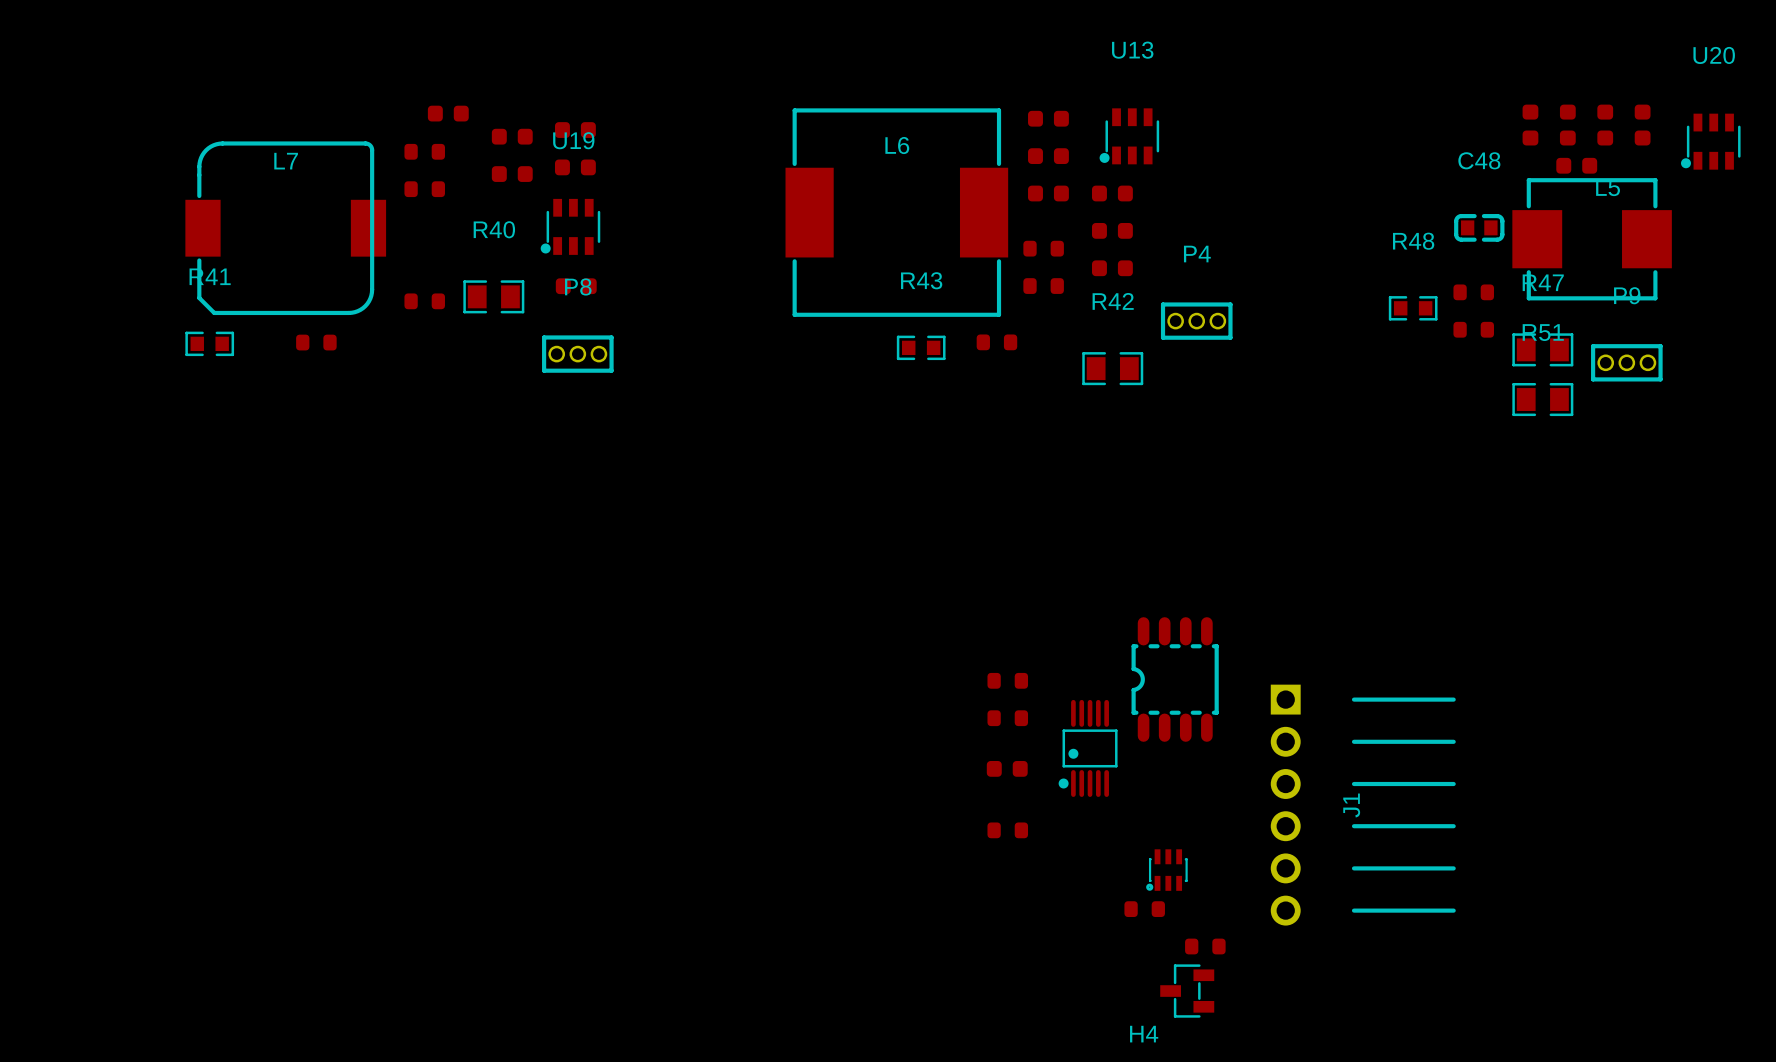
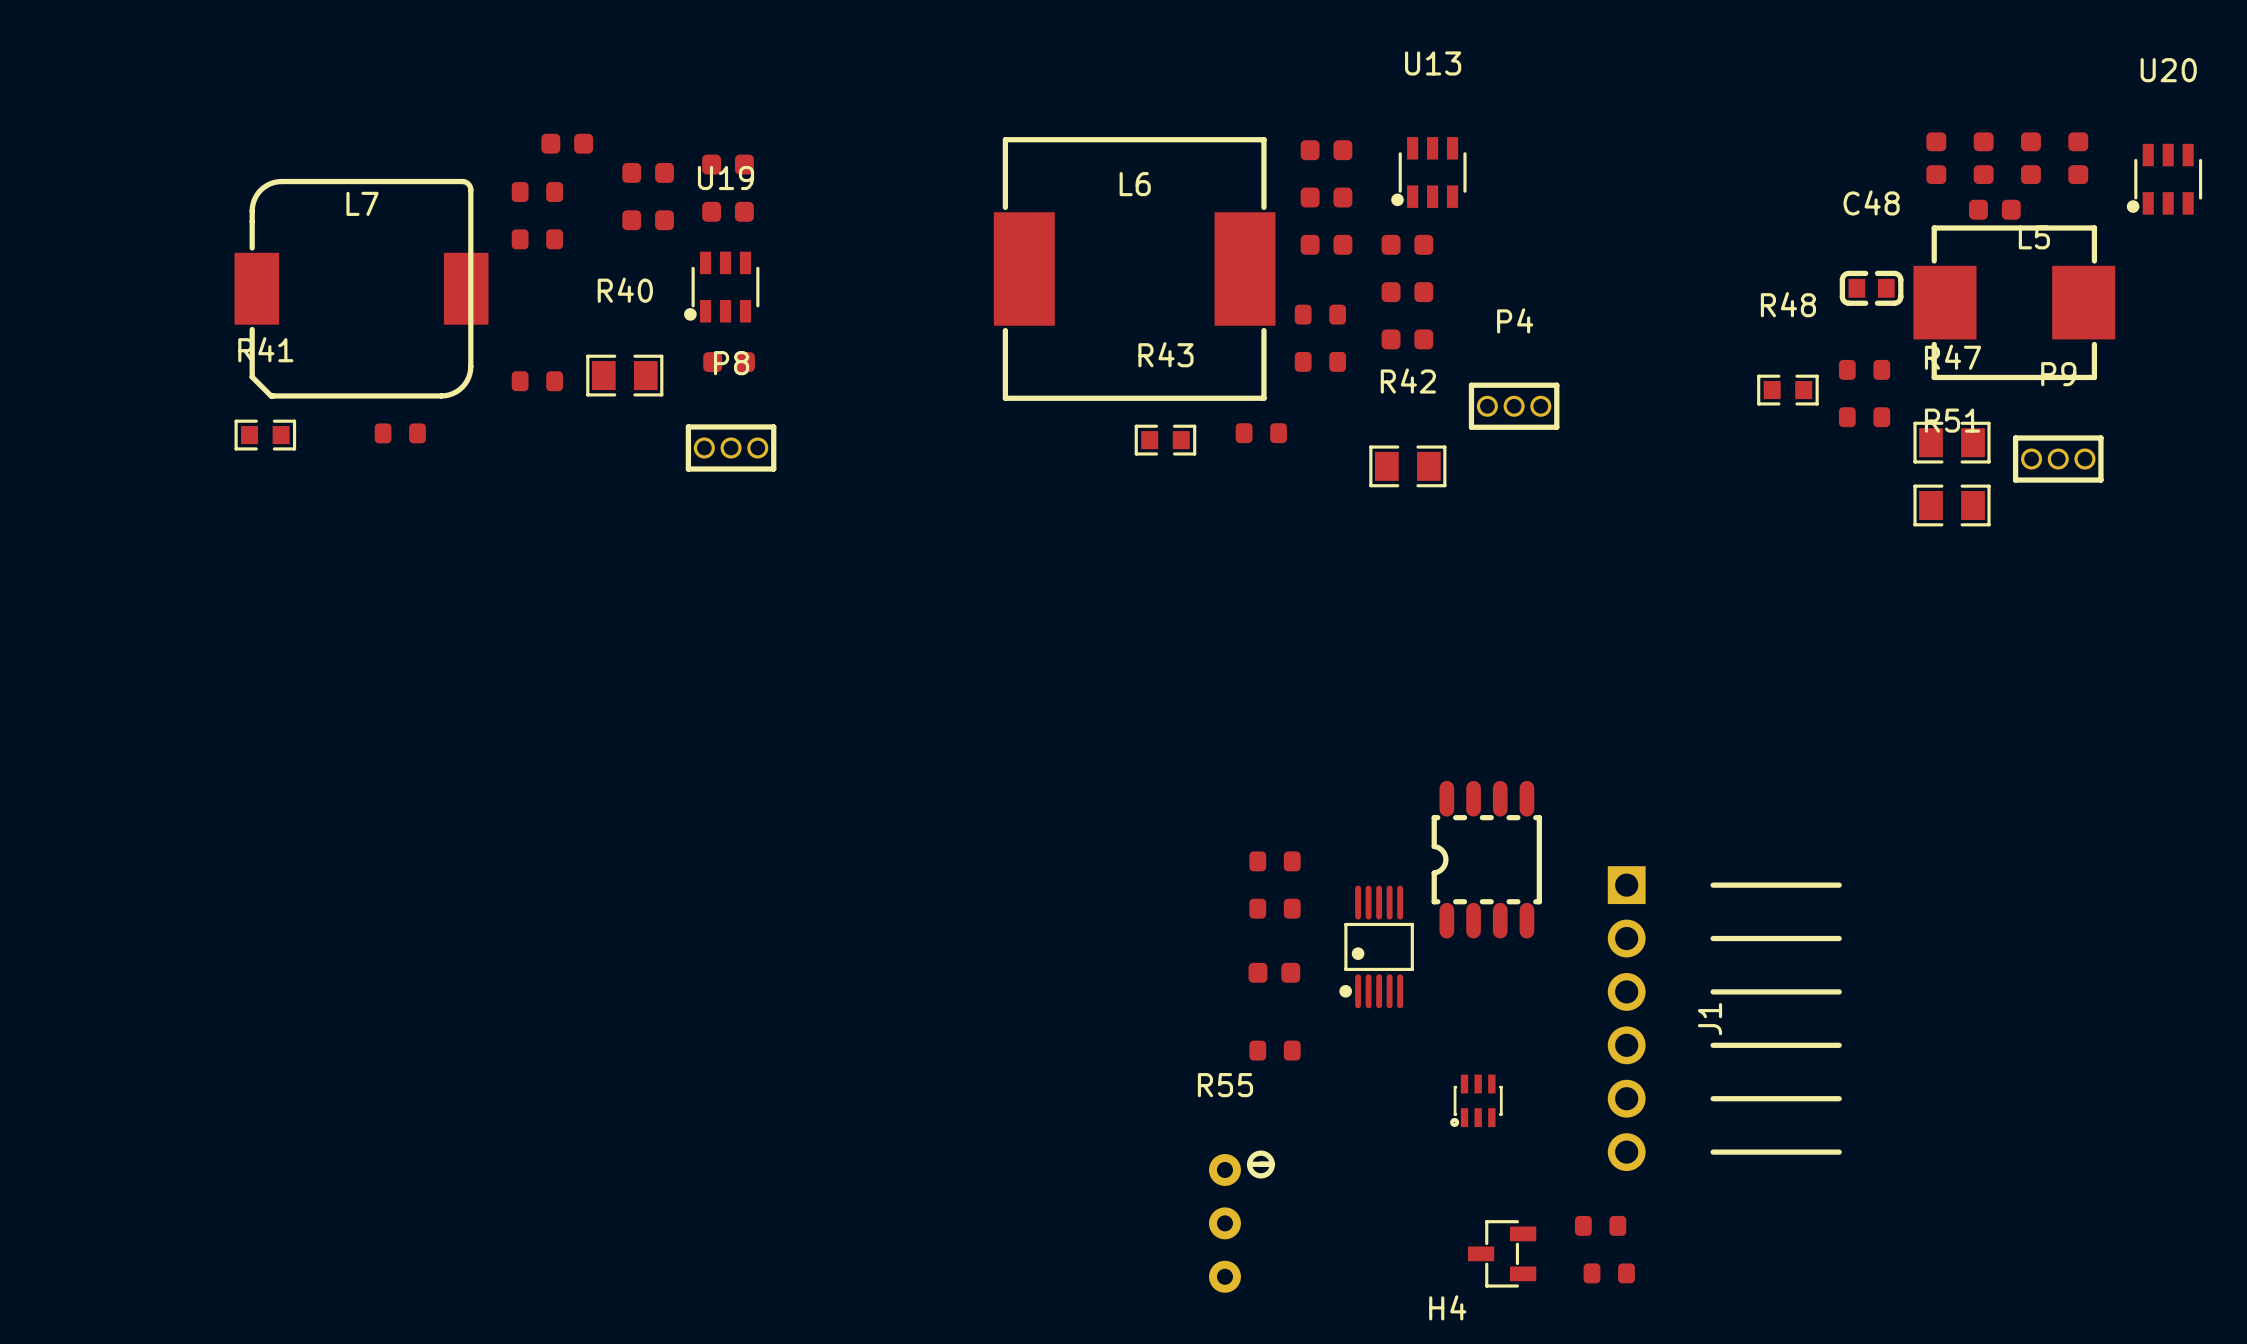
part: (1144, 909) -> none
part: (1205, 946) -> none
R55: none -> (1241, 1221)
part: none -> (1600, 1225)
part: none -> (1609, 1273)

